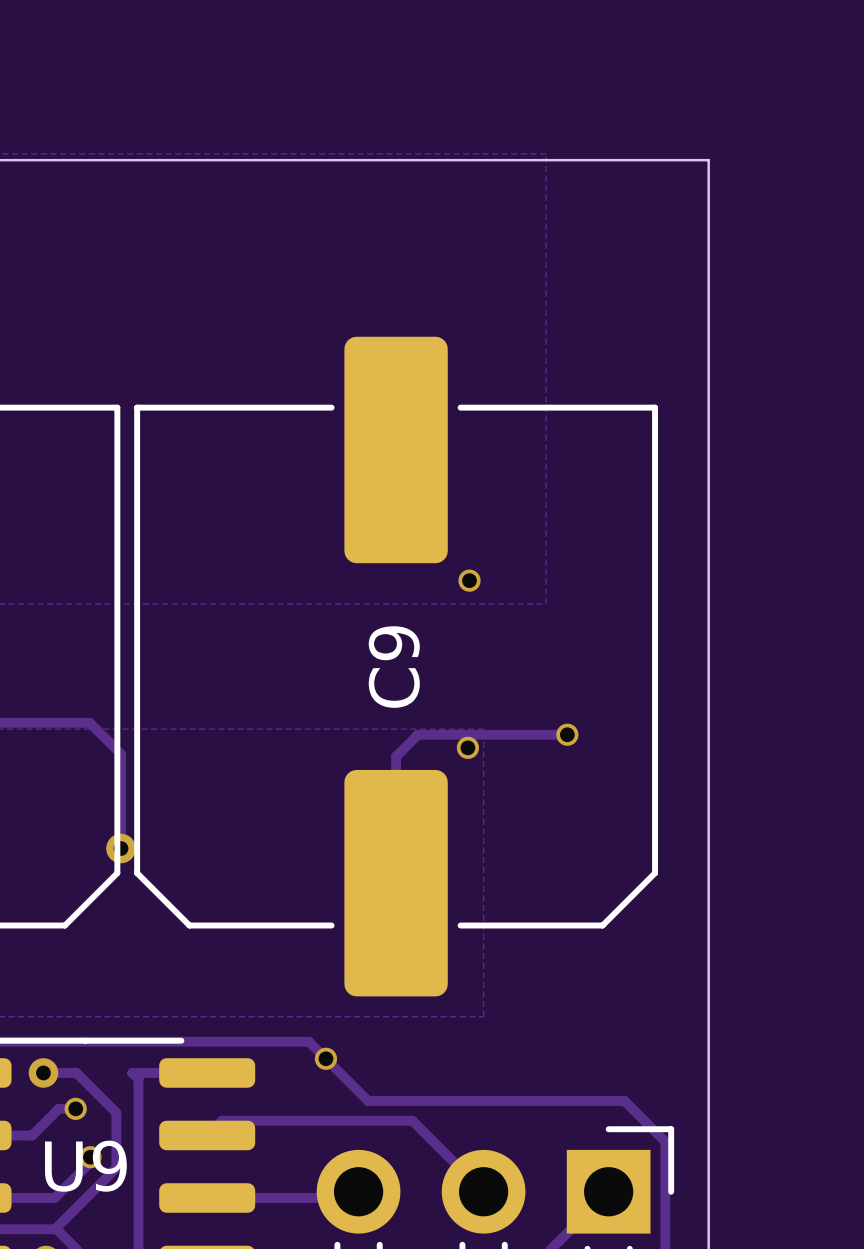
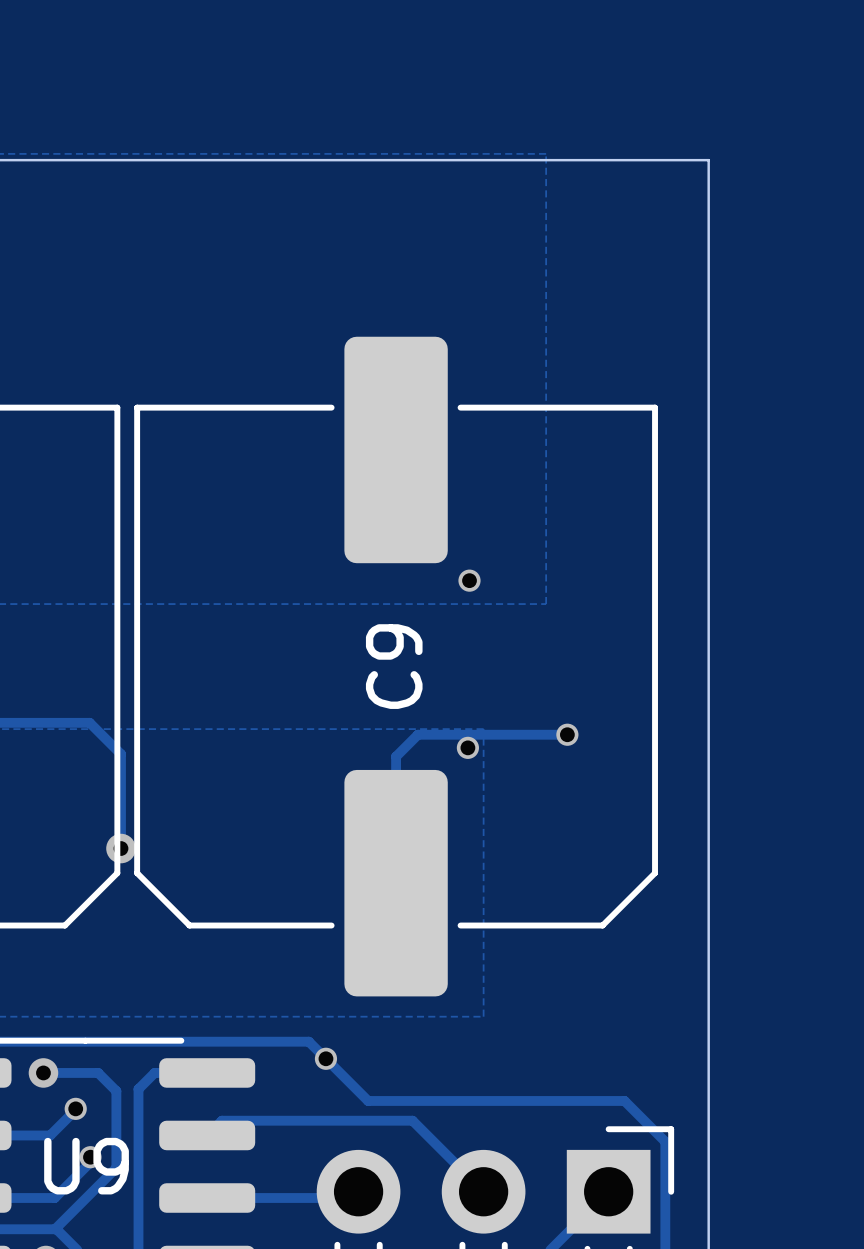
track: (76, 1072) (116, 1112) -> (76, 1072) (98, 1072) (116, 1091) (116, 1112)
track: (154, 1072) (132, 1072) (138, 1079) (138, 1089) -> (154, 1072) (138, 1089)
track: (75, 1108) (58, 1108) (32, 1135) -> (75, 1108) (50, 1135) (32, 1135)

